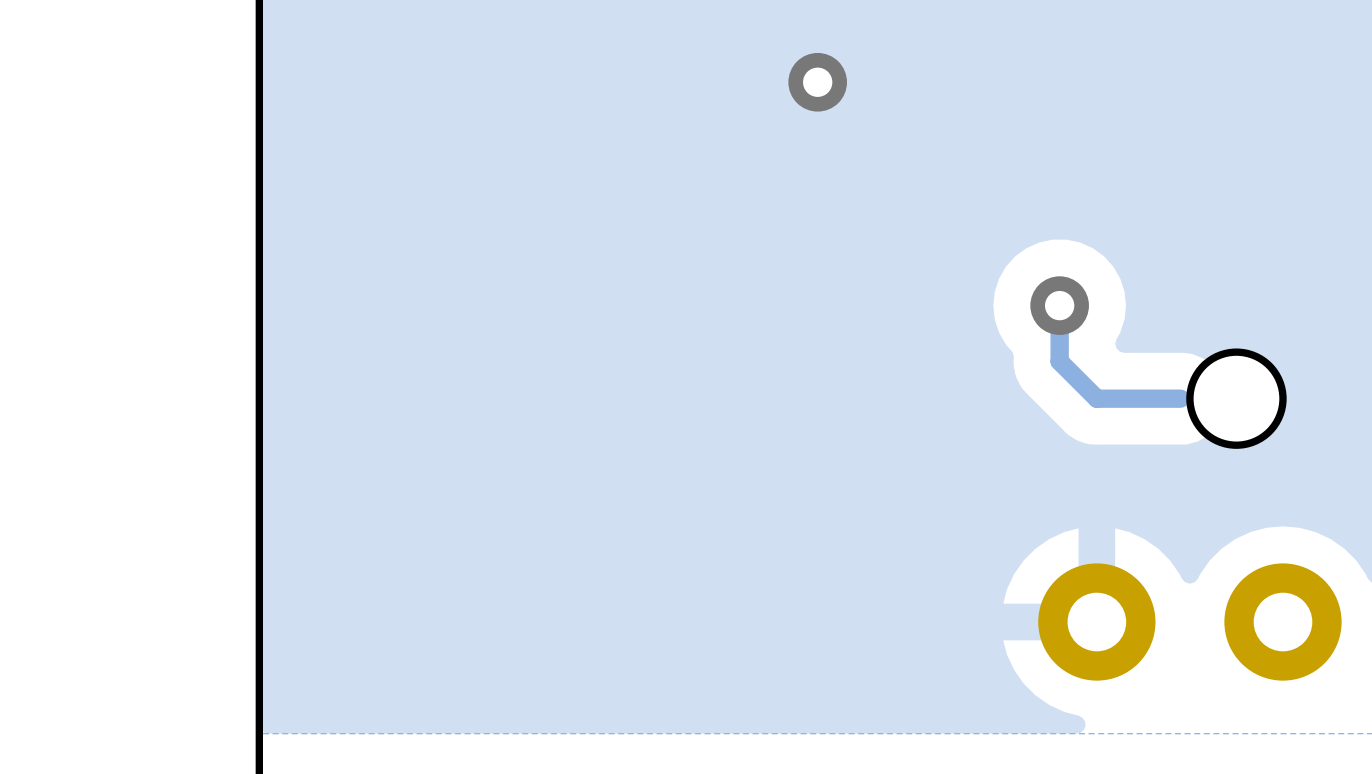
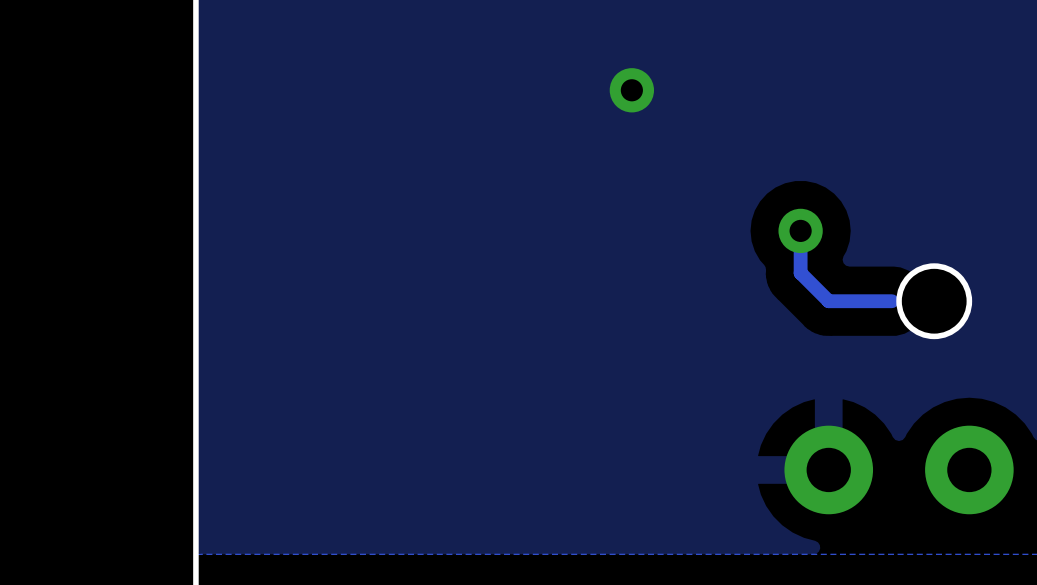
via position: (817, 82) -> (631, 90)

